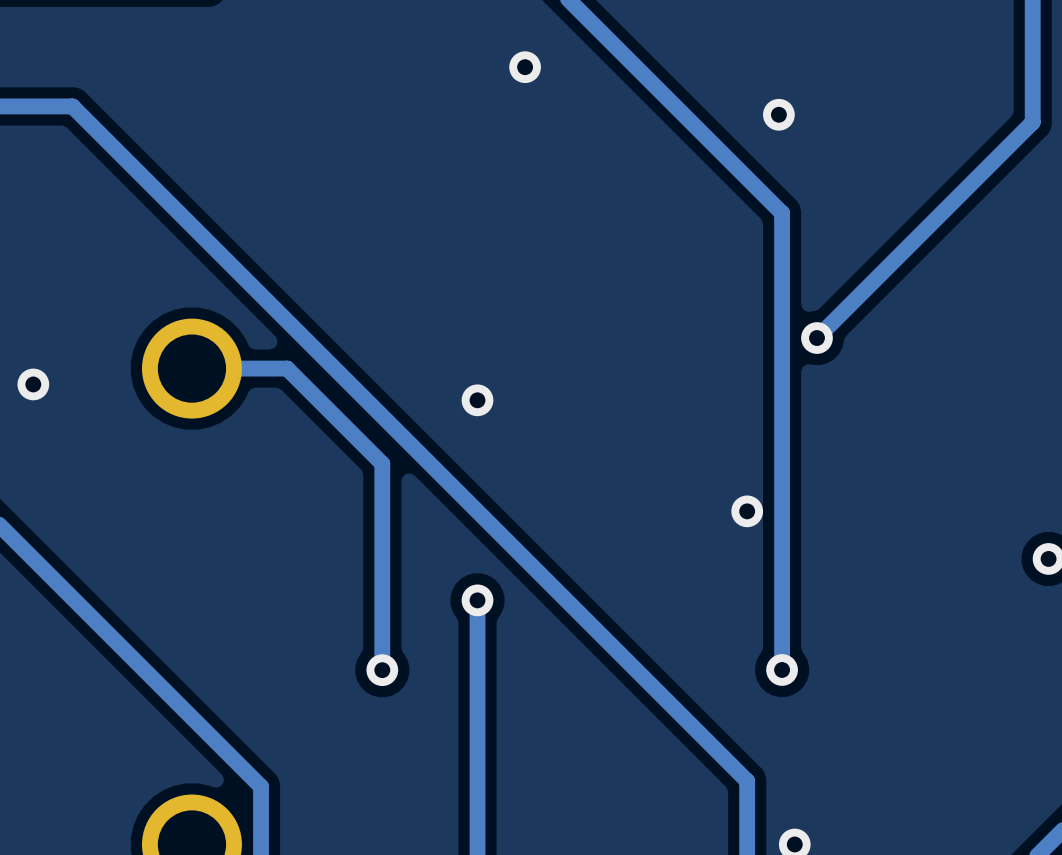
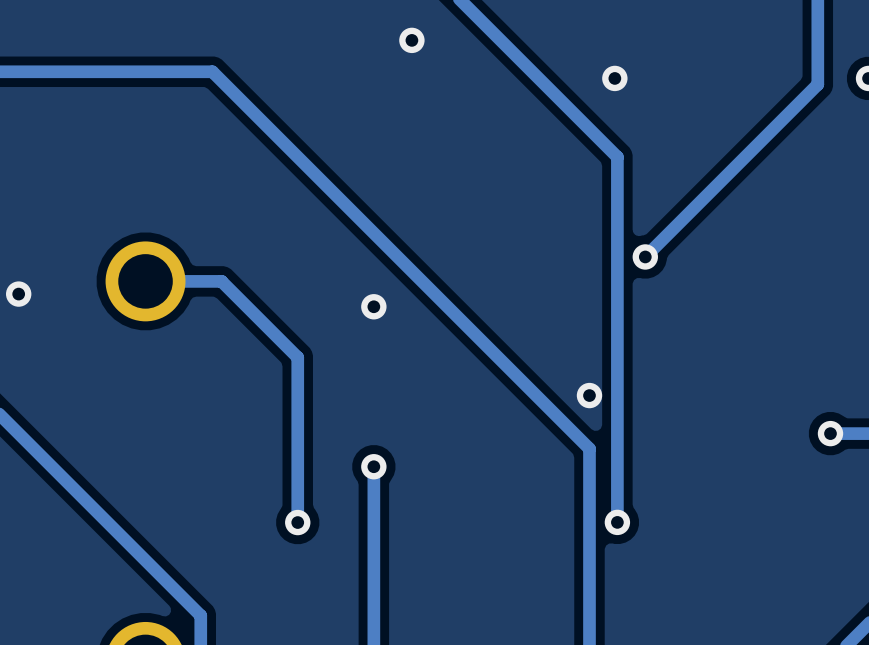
track: (72, 106) (747, 781) -> (50, 71) (212, 71) (589, 448) (589, 611)

